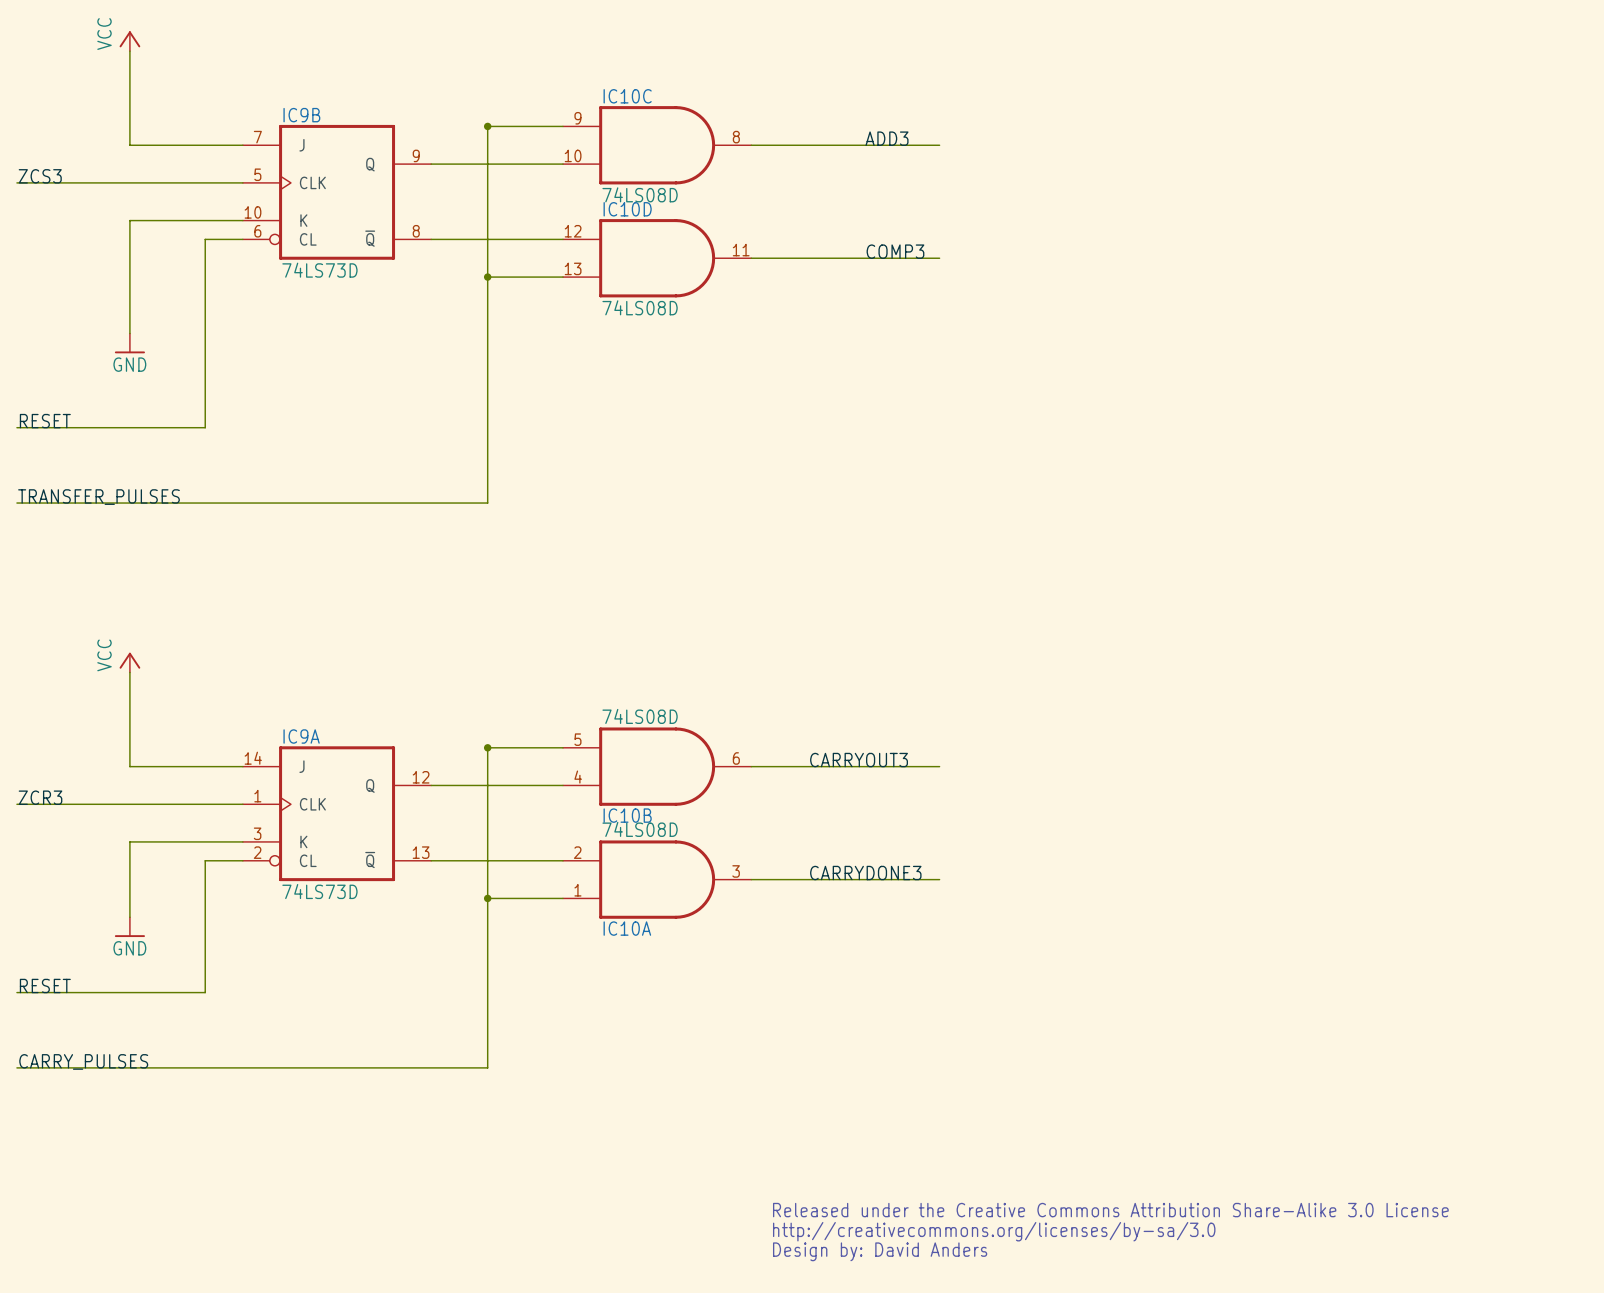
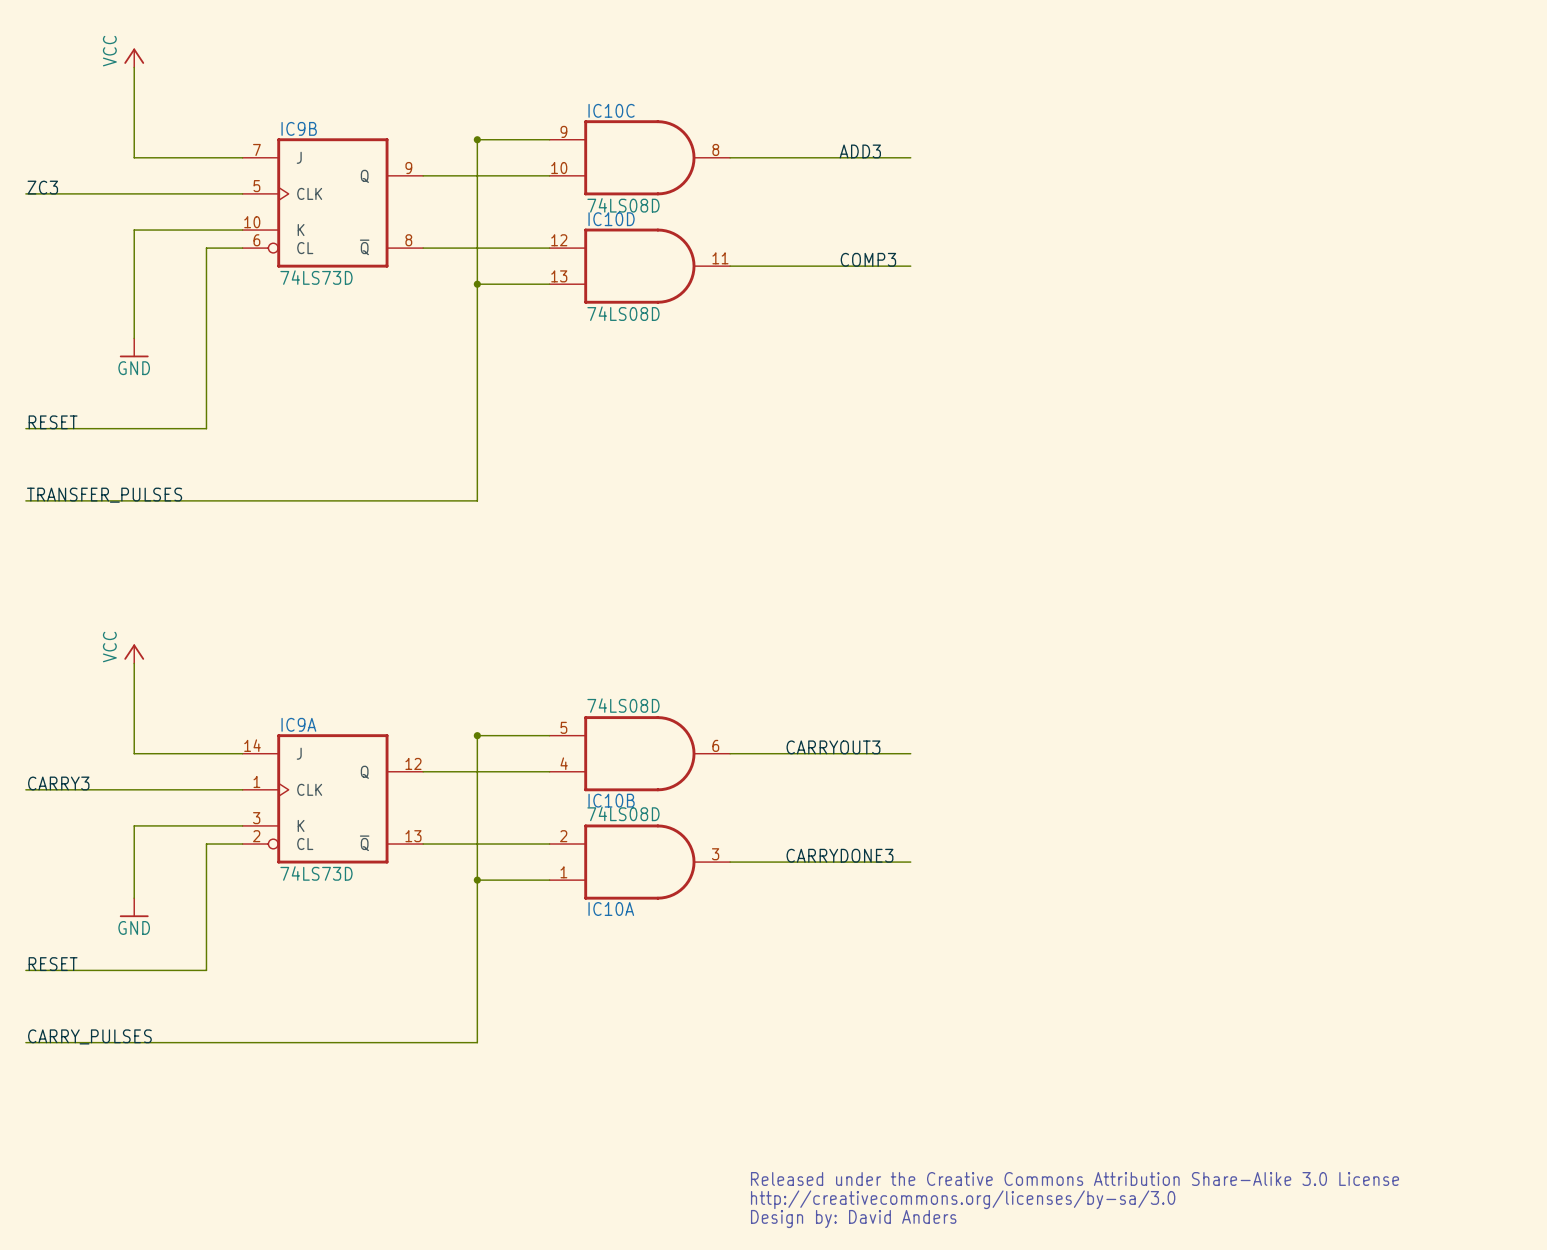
label: ZCS3 (40, 176) -> ZC3 (42, 187)
label: ZCR3 (40, 797) -> CARRY3 (58, 783)

